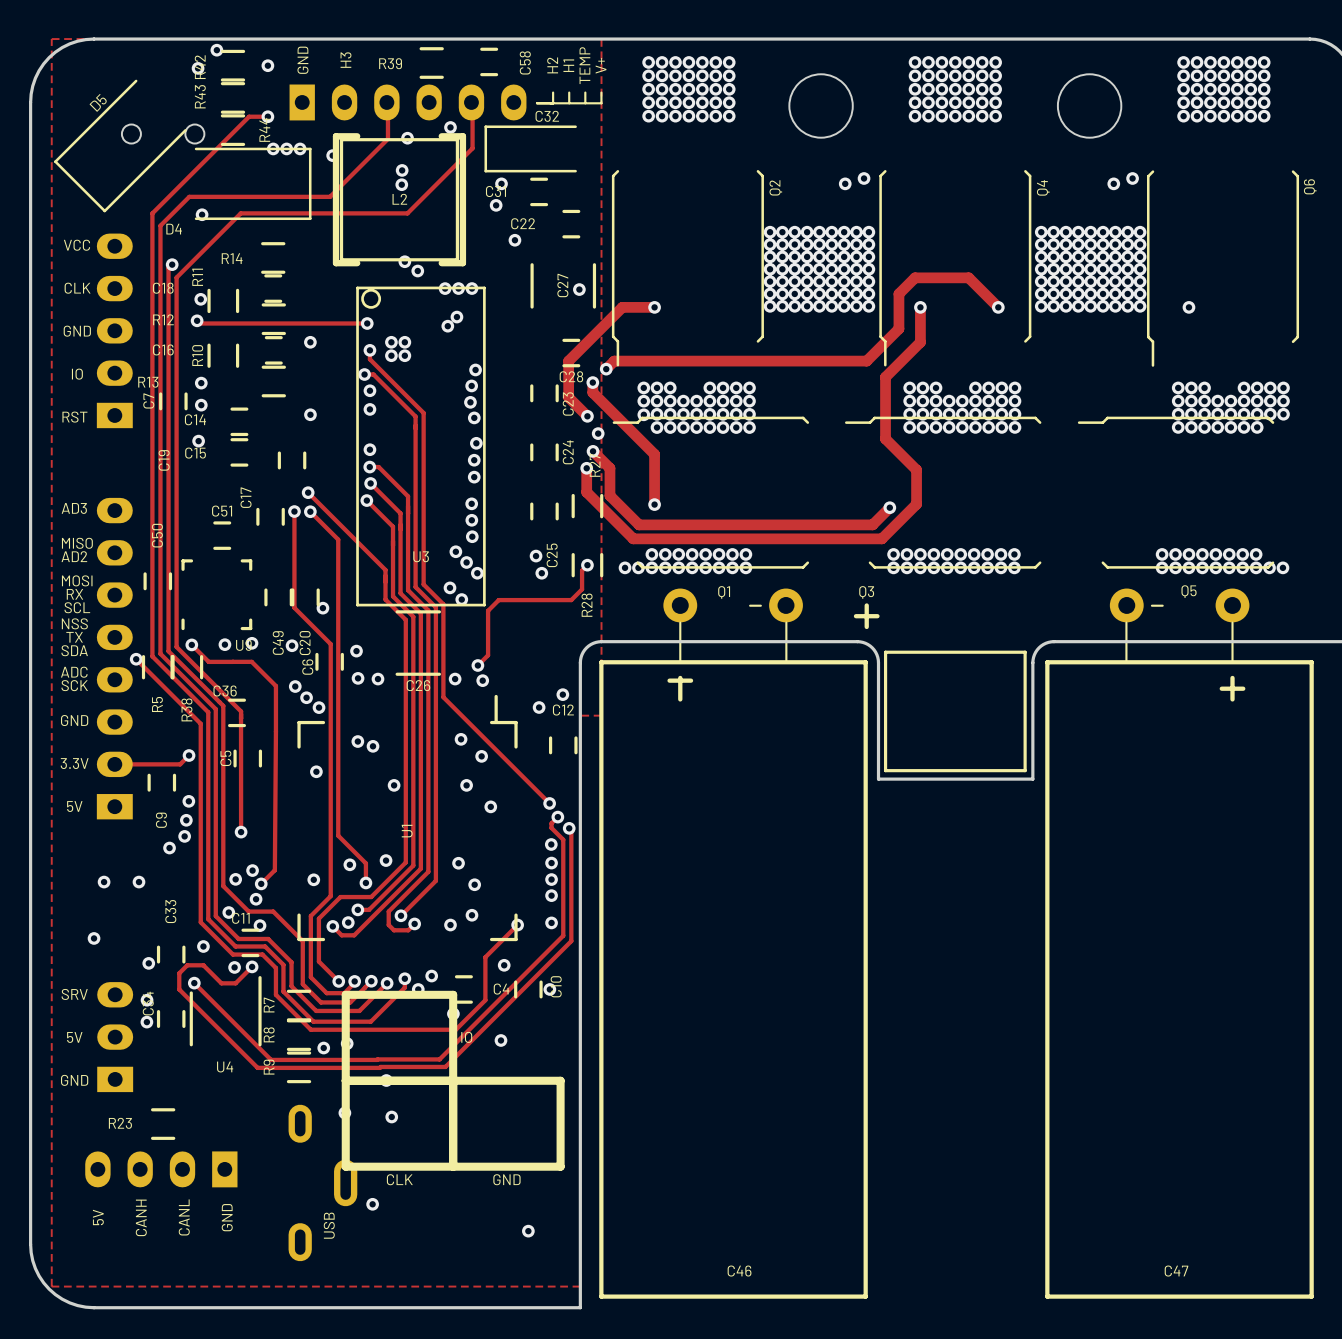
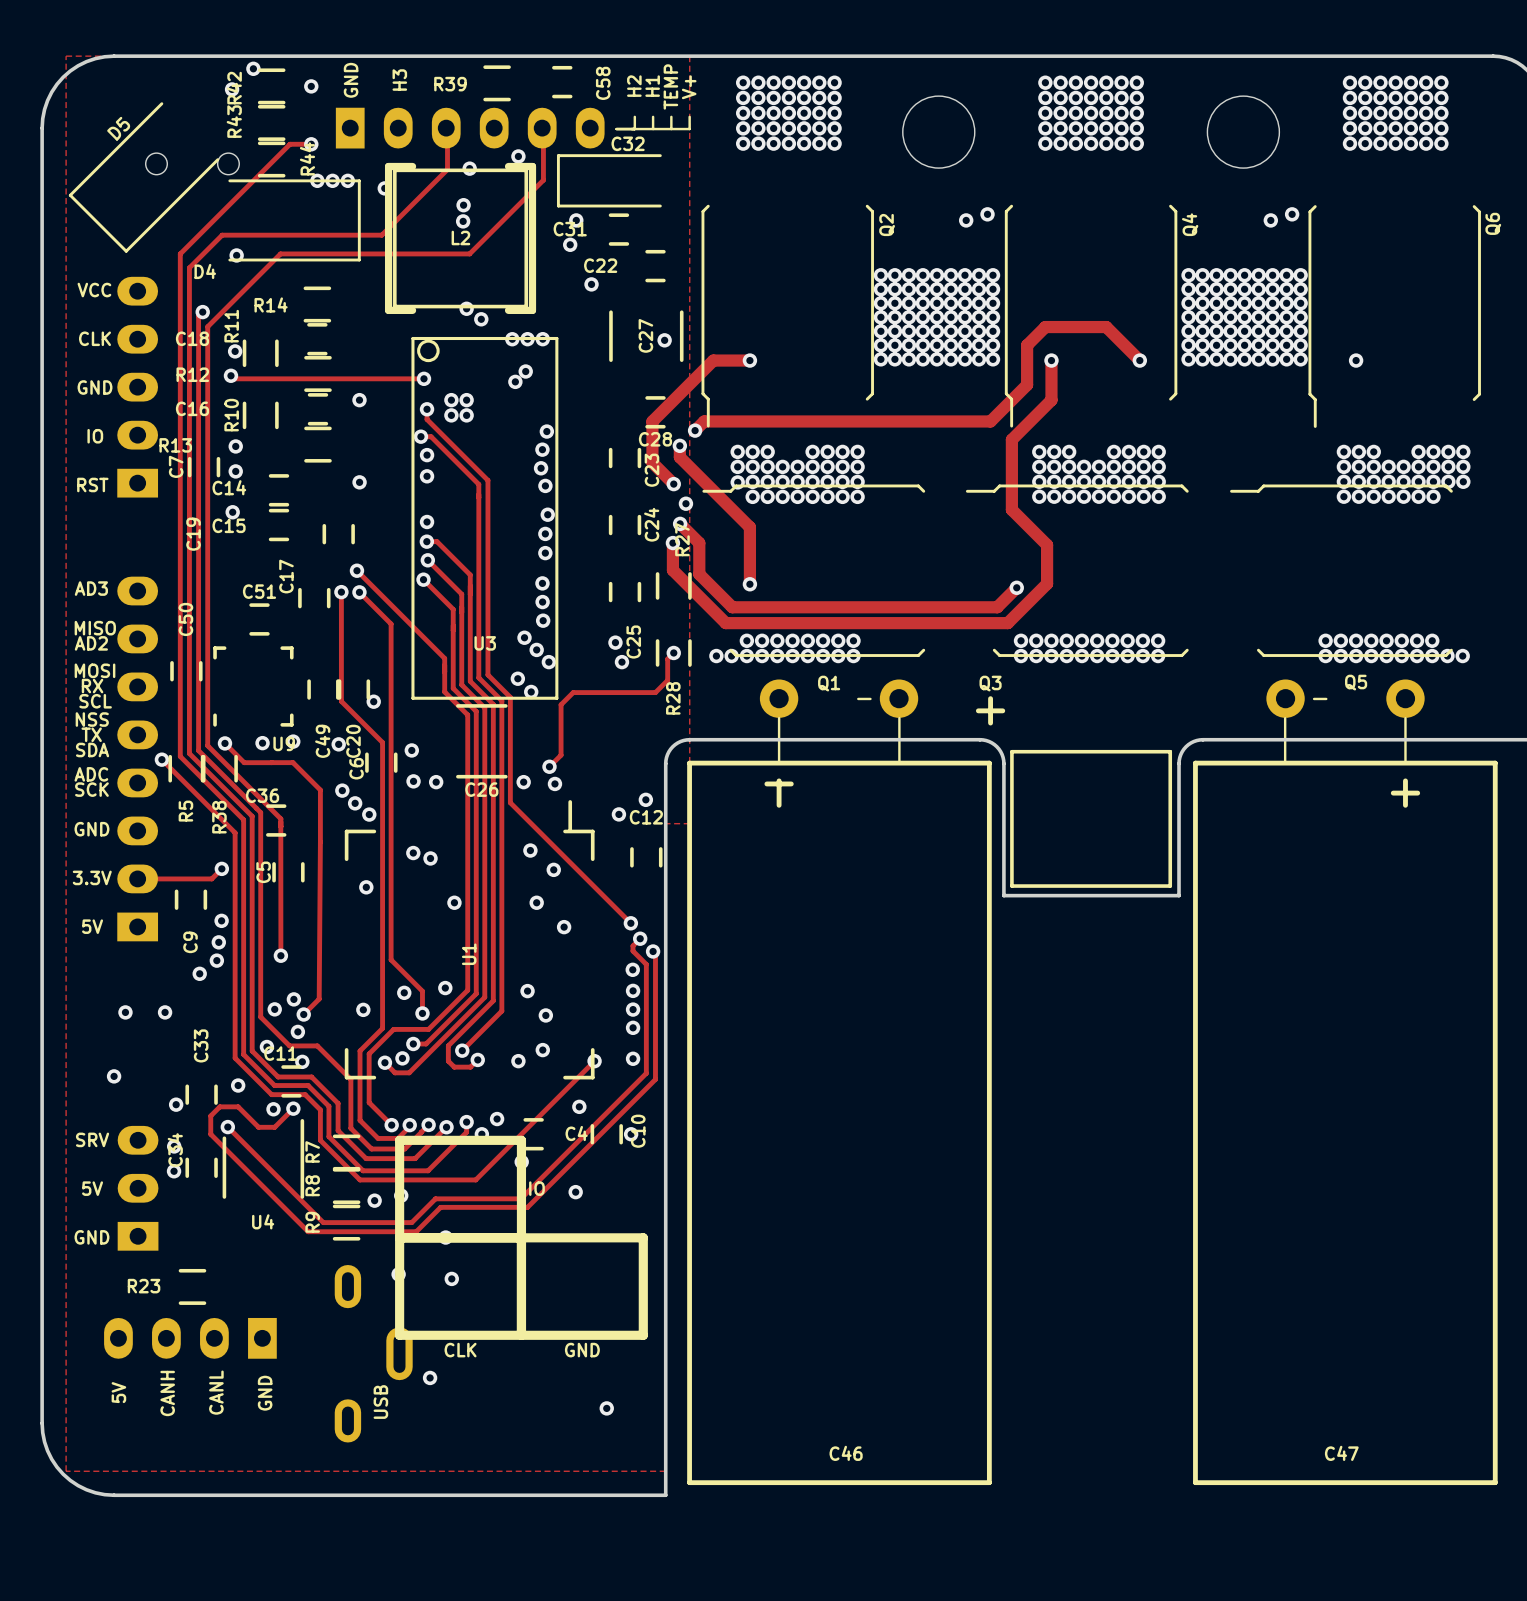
track: (485, 957) (485, 1000) (455, 1029) (412, 1029) -> (558, 1097) (475, 1179)
track: (452, 1046) (439, 1059) (271, 1059) -> (520, 1198) (435, 1198) (411, 1222) (323, 1222) (314, 1214)
track: (458, 1053) (445, 1066) (257, 1067) -> (527, 1207) (440, 1207) (416, 1231) (308, 1231) (299, 1223)

